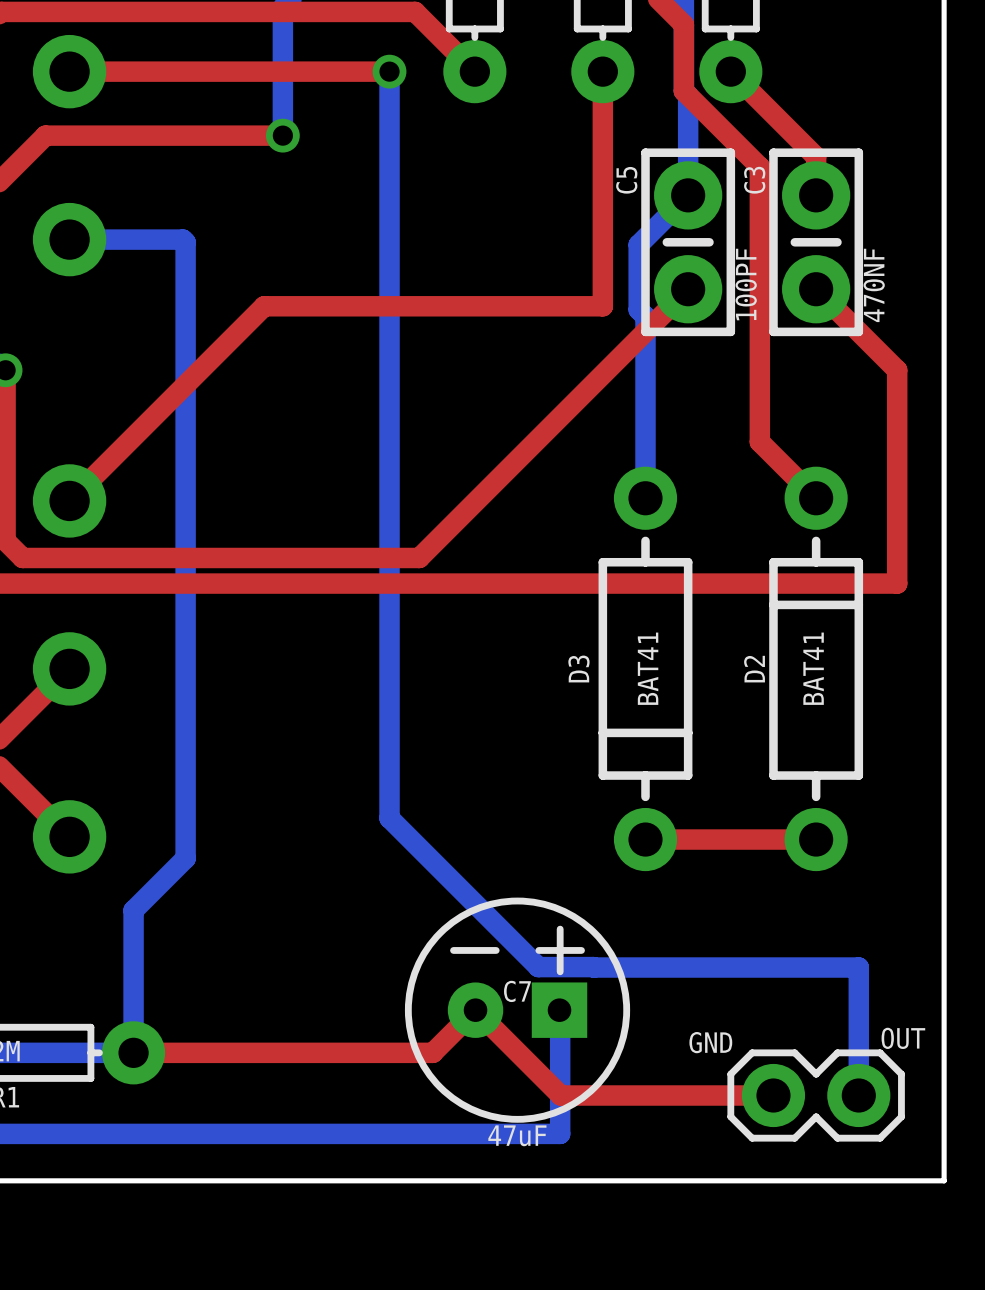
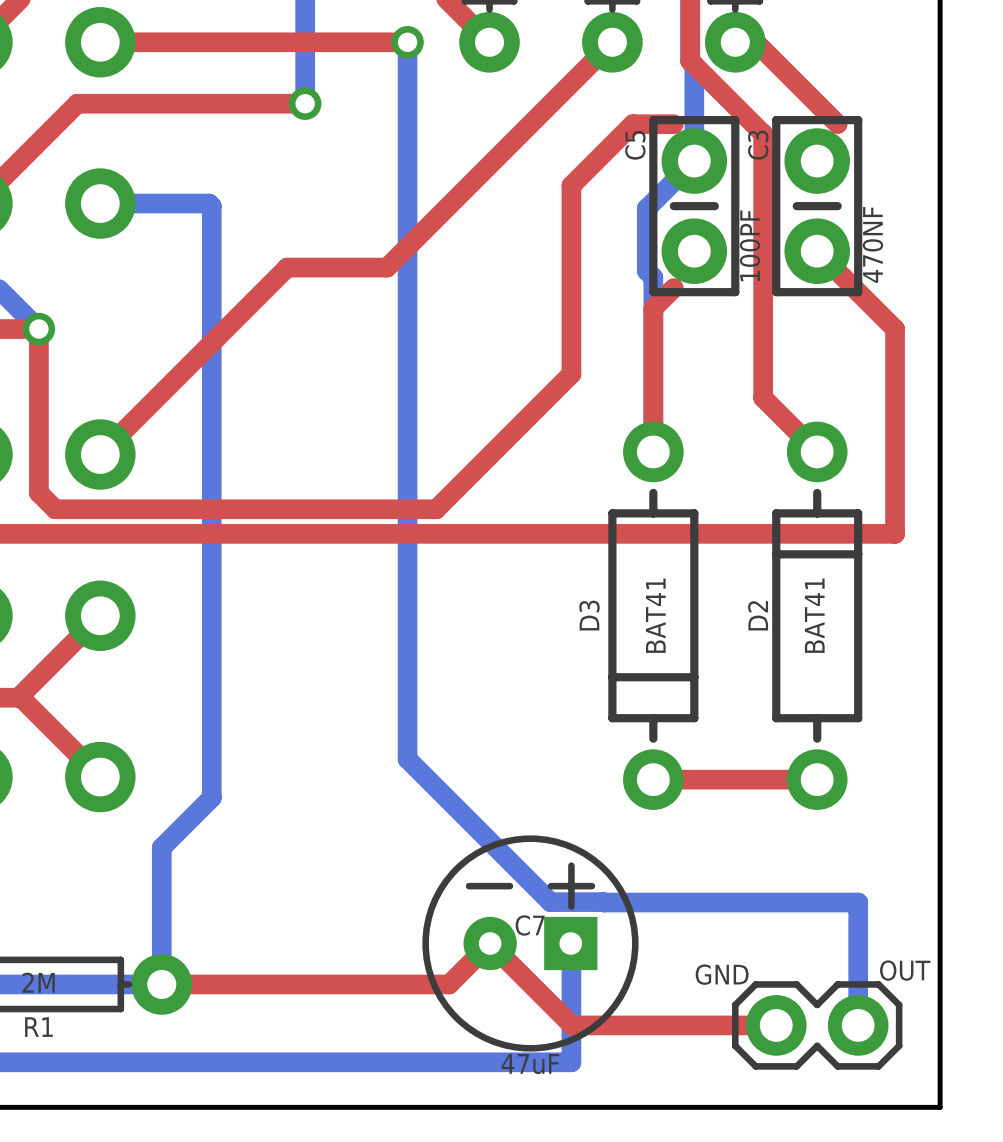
top track: (602, 71) (602, 306) (368, 306) -> (612, 42) (387, 267)
top track: (730, 71) (816, 156) (816, 195) -> (735, 42) (755, 42) (837, 124)
top track: (688, 289) (560, 417) -> (673, 124) (632, 124) (571, 185) (571, 374)
top track: none -> (673, 288) (653, 308) (653, 451)

